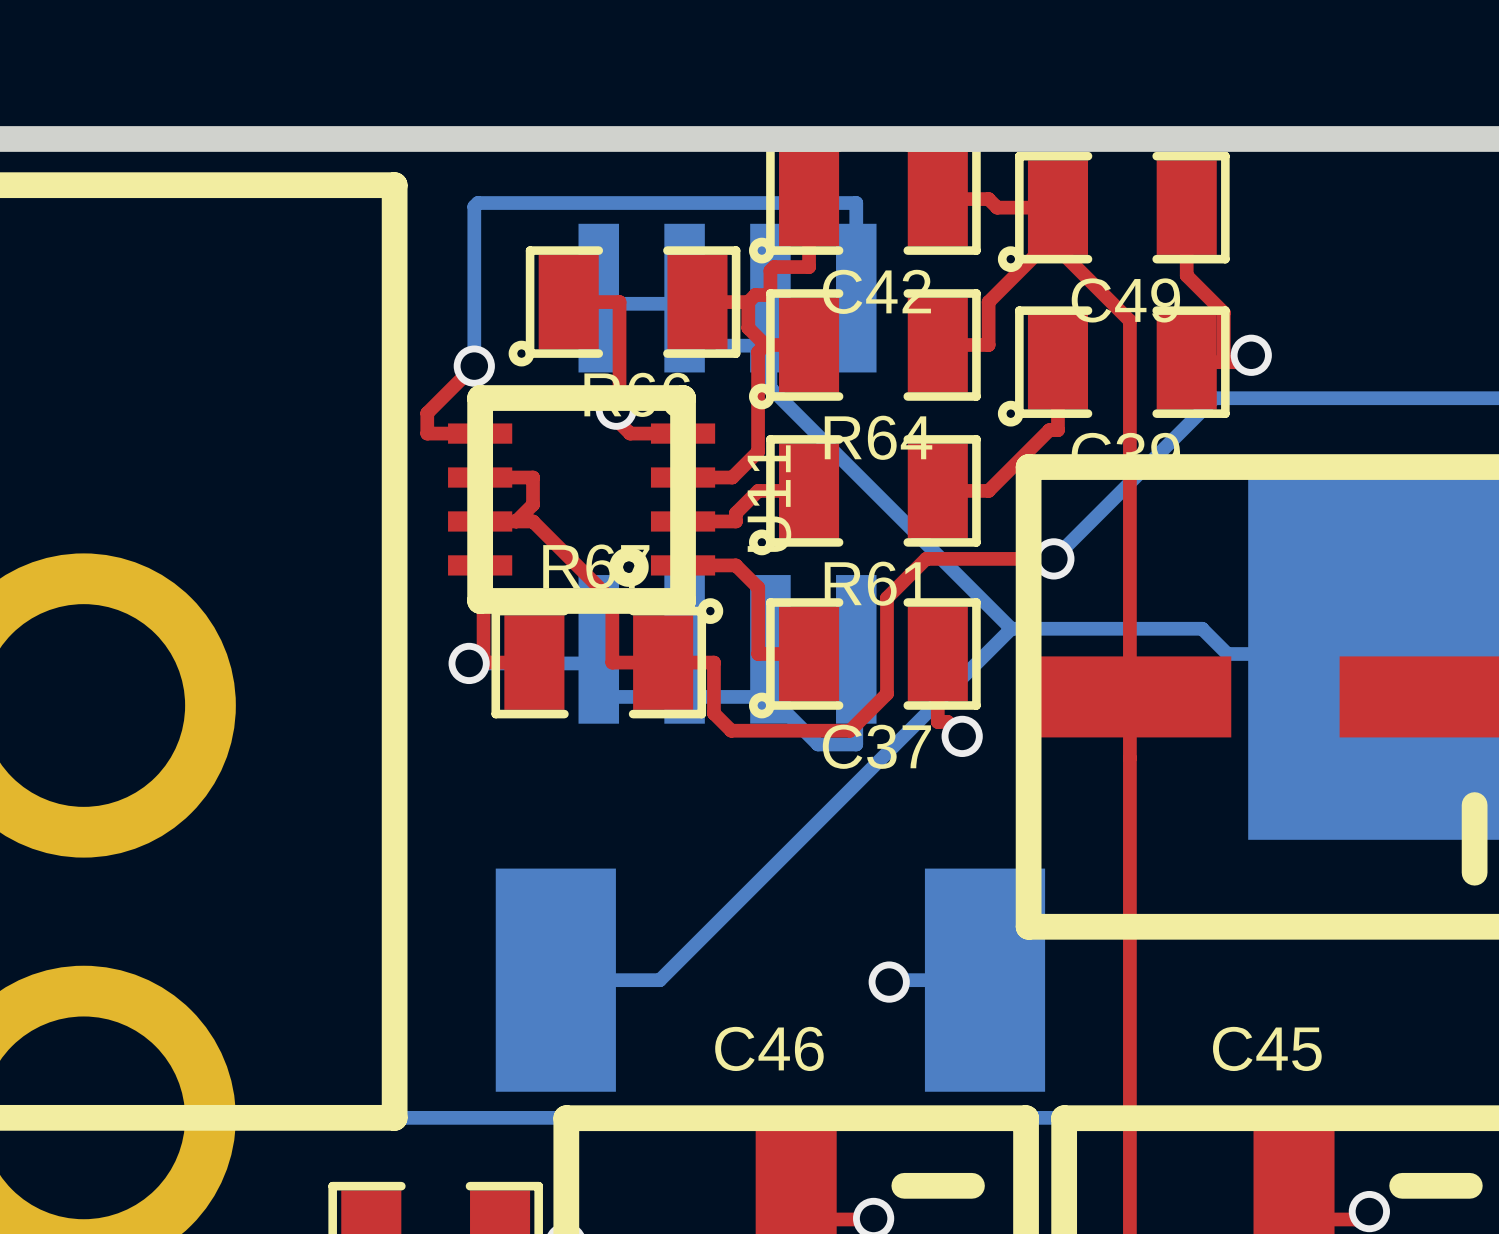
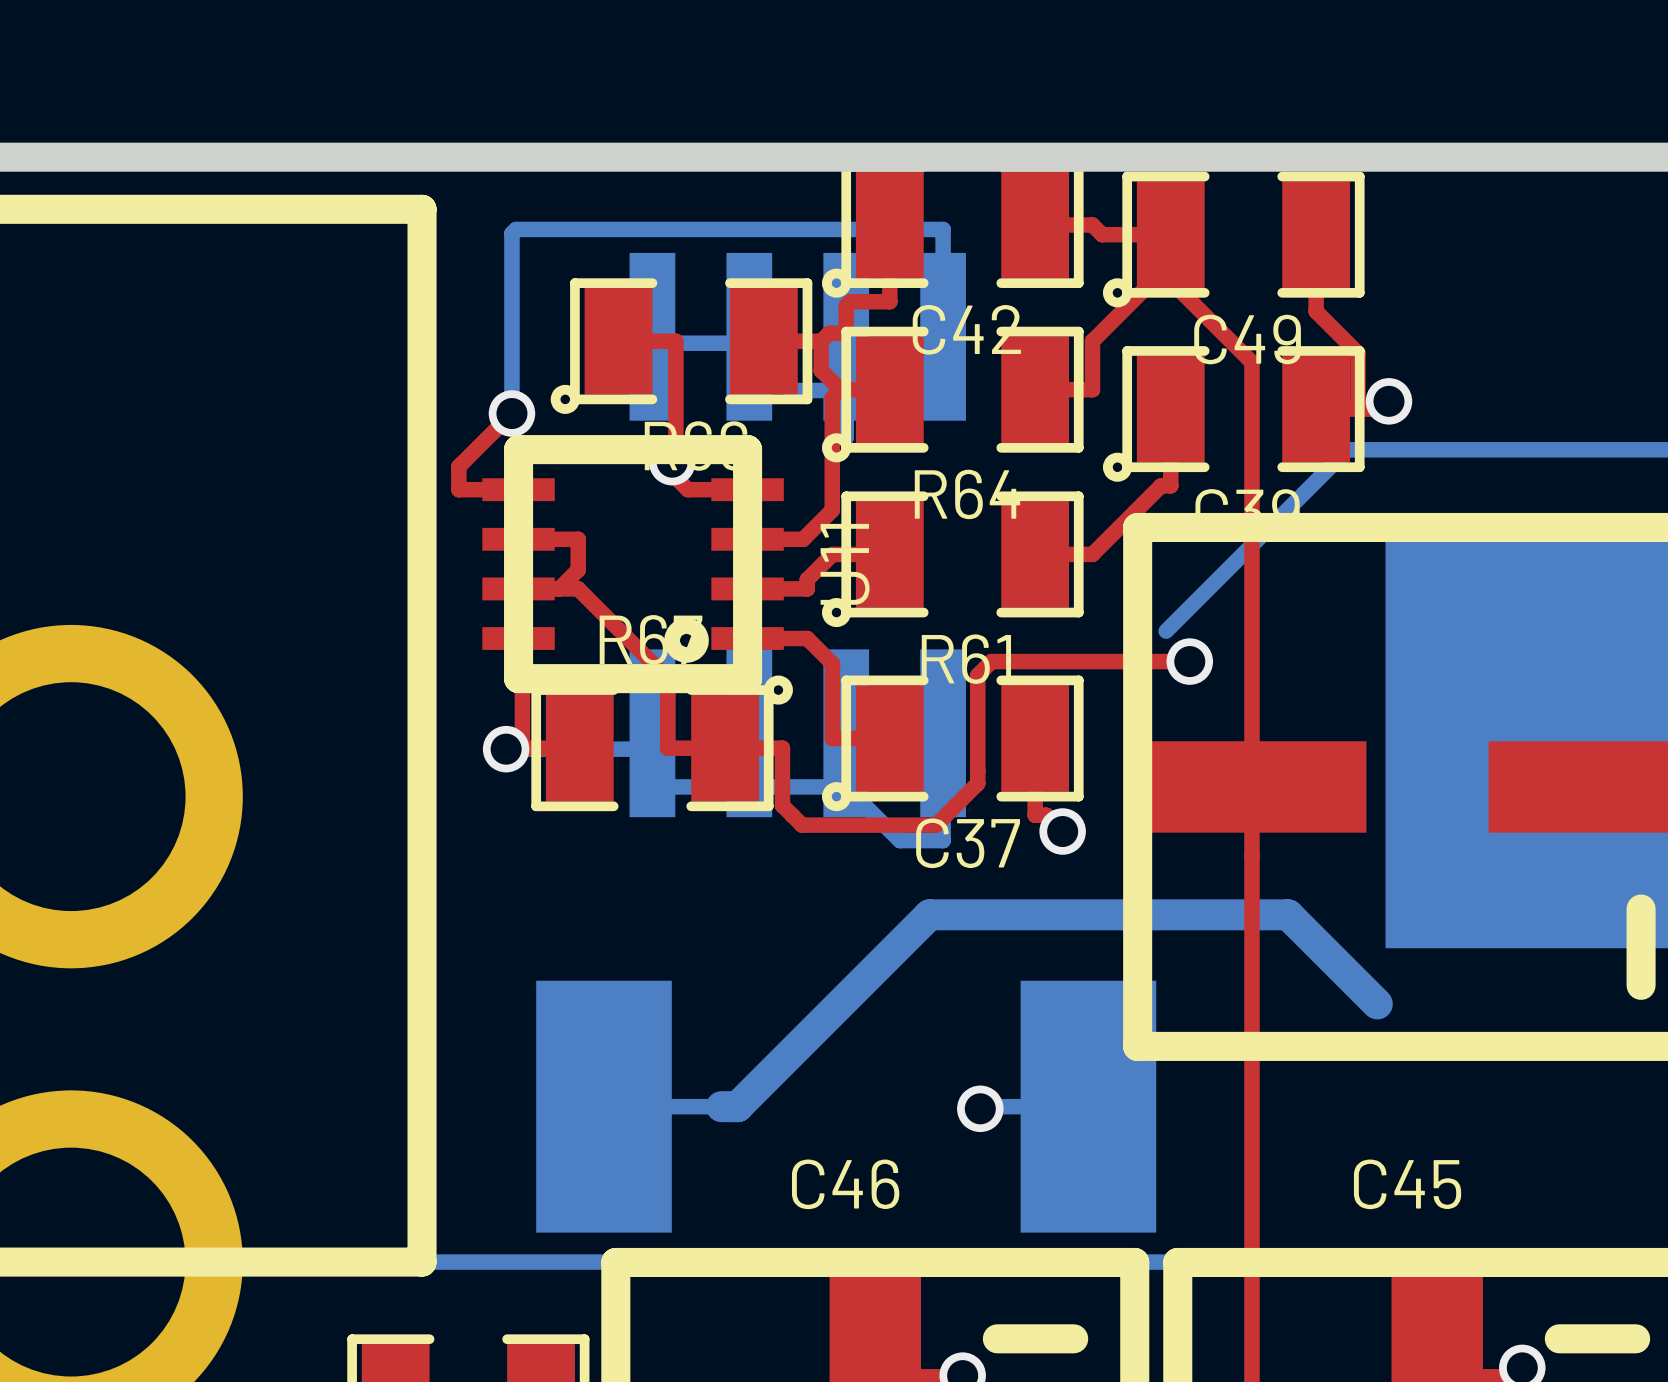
bottom track: (770, 387) (1011, 628) -> none
top track: (1053, 558) (926, 558) (899, 585) -> (1189, 661) (991, 661)
via position: (1053, 558) -> (1189, 661)
bottom track: (1011, 628) (659, 980) -> (1377, 1003) (1288, 914) (929, 914) (737, 1106) (721, 1106)
bottom track: (1011, 628) (1202, 628) (1227, 654) (1378, 654) -> none

